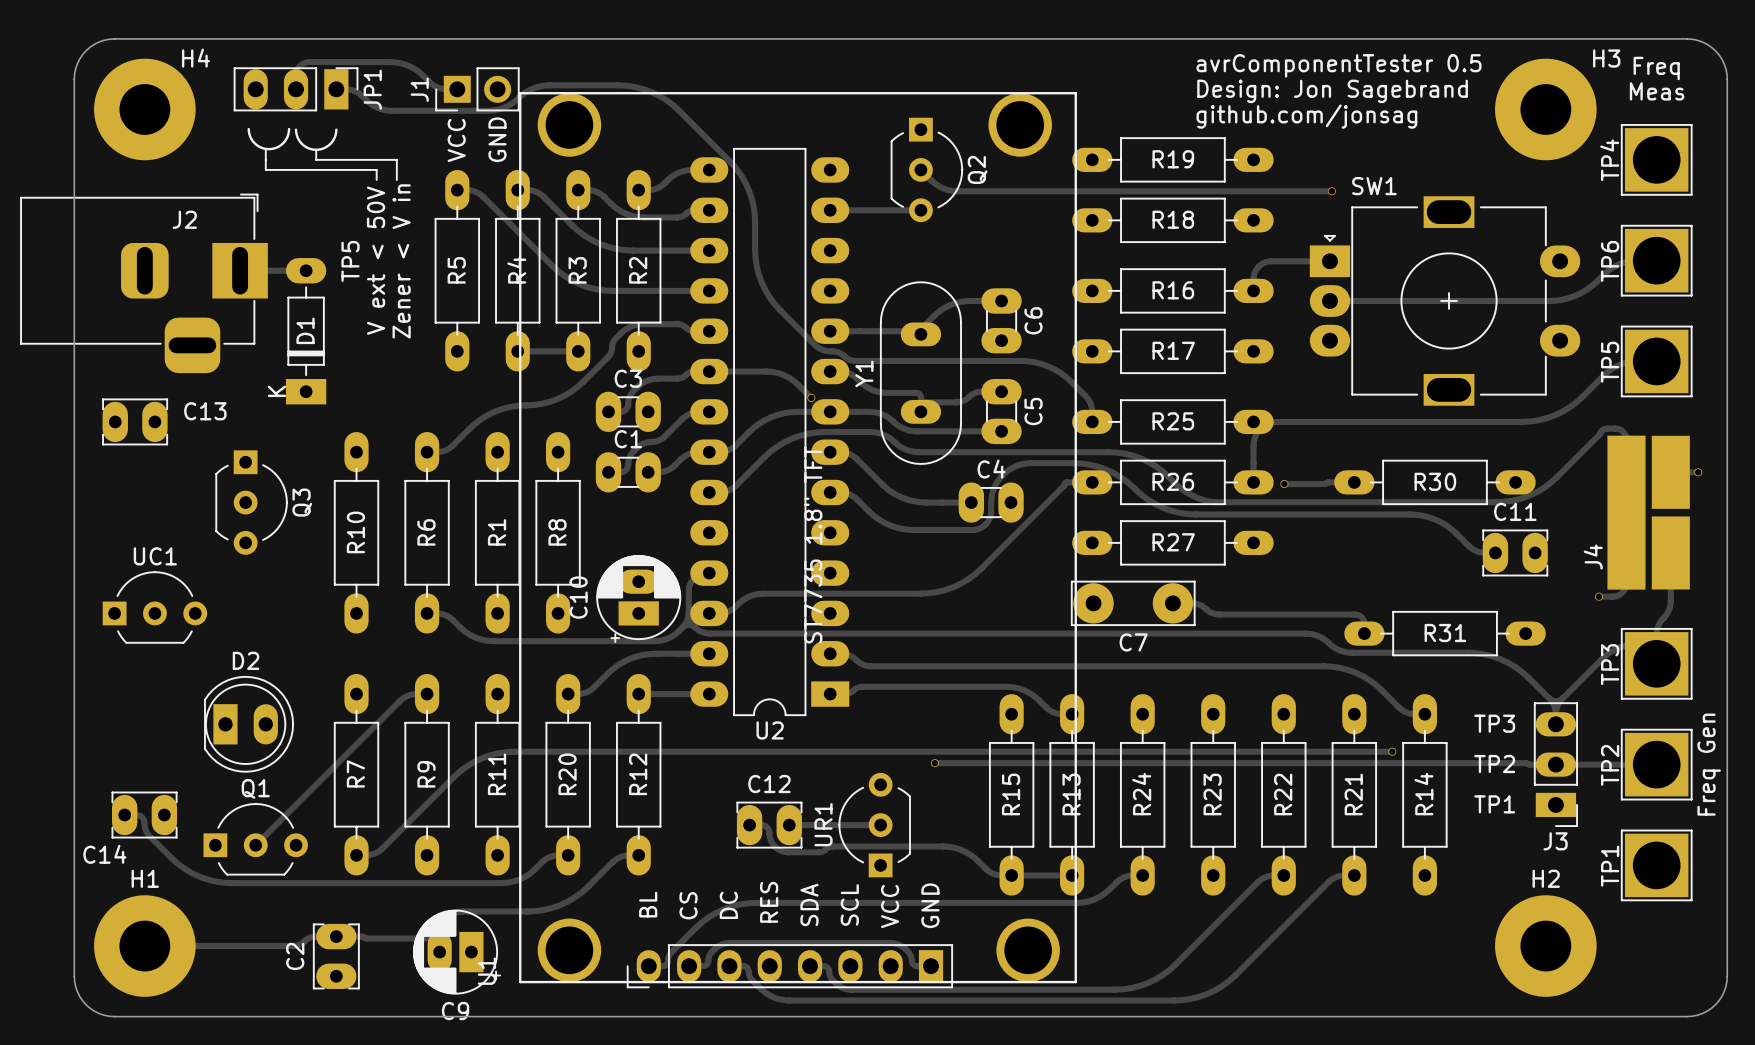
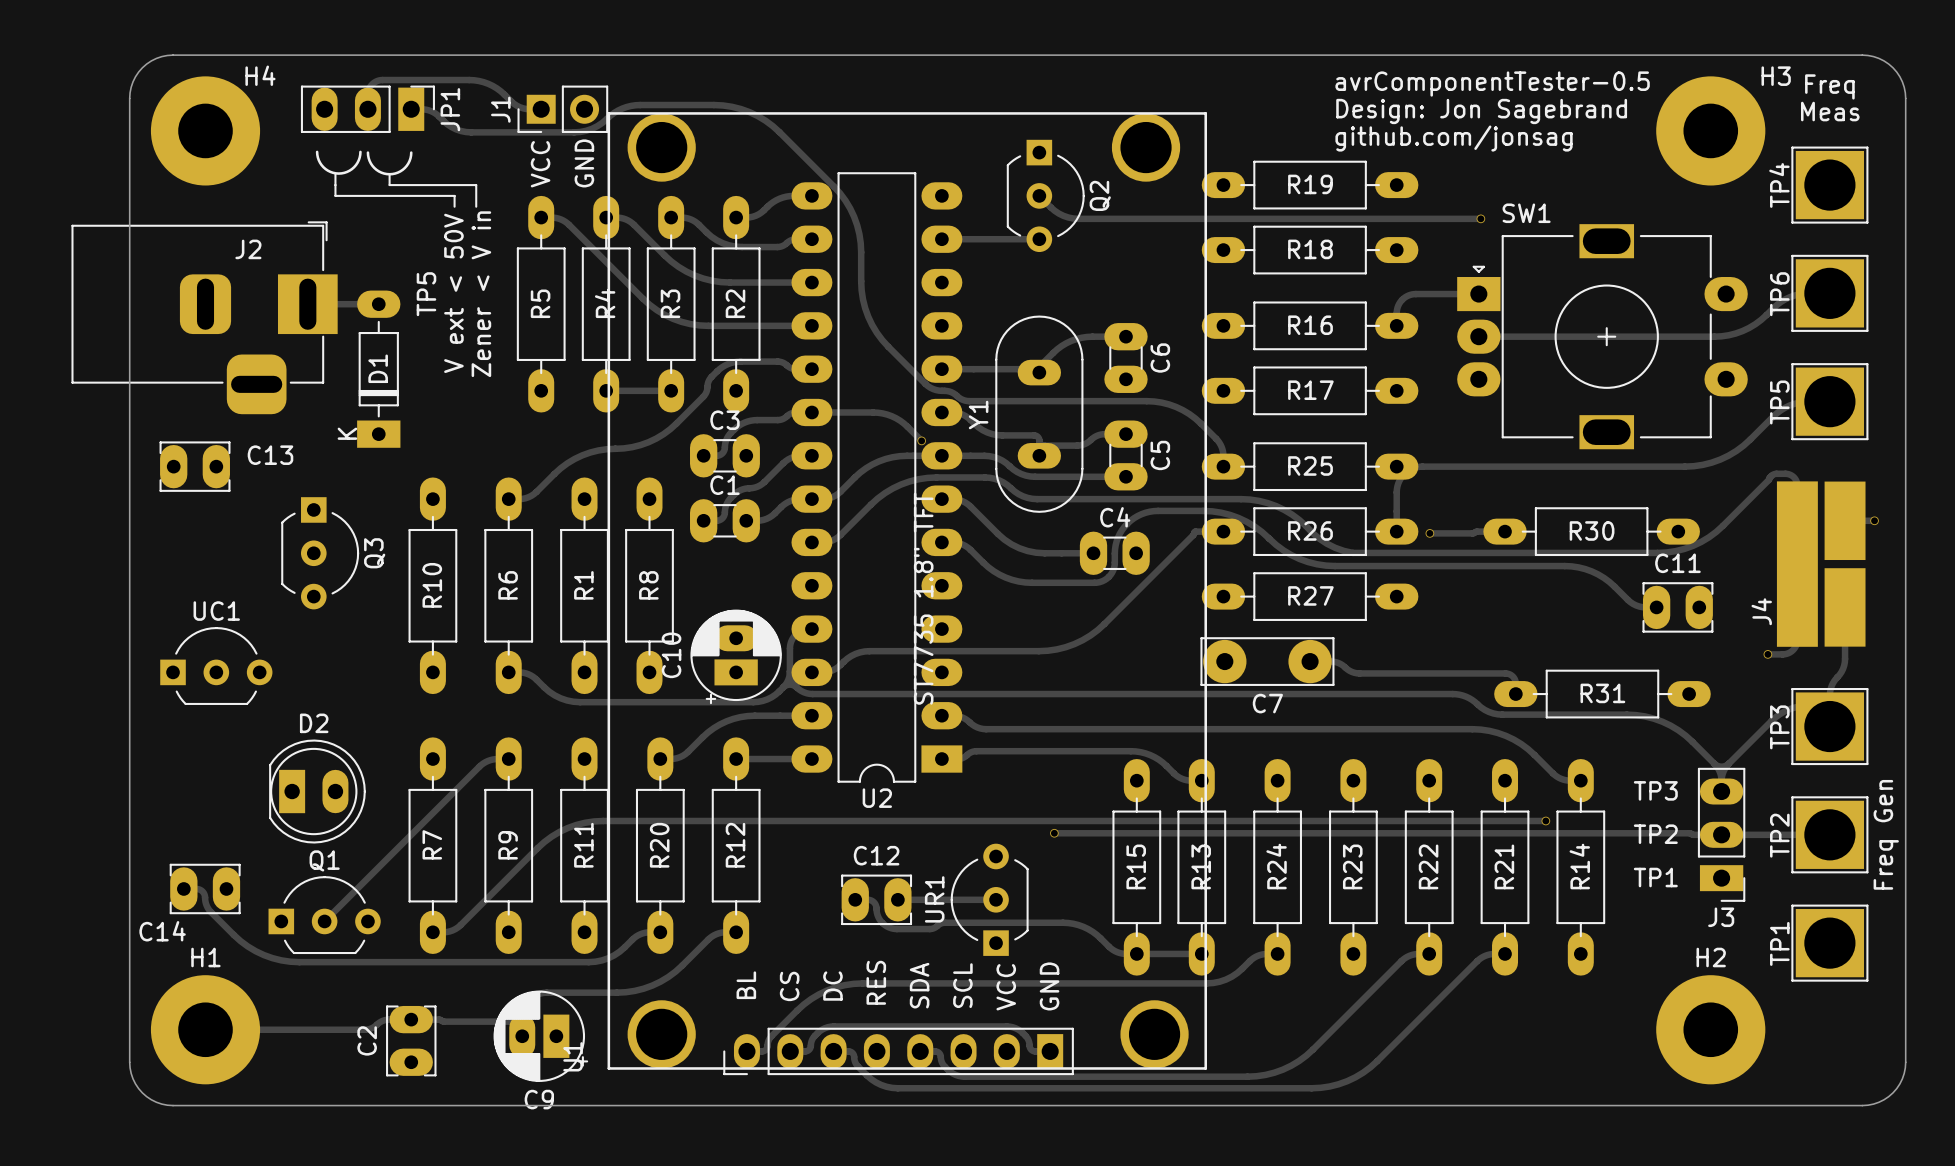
text: avrComponentTester 0.5 (1339, 65) -> avrComponentTester-0.5 (1492, 84)

